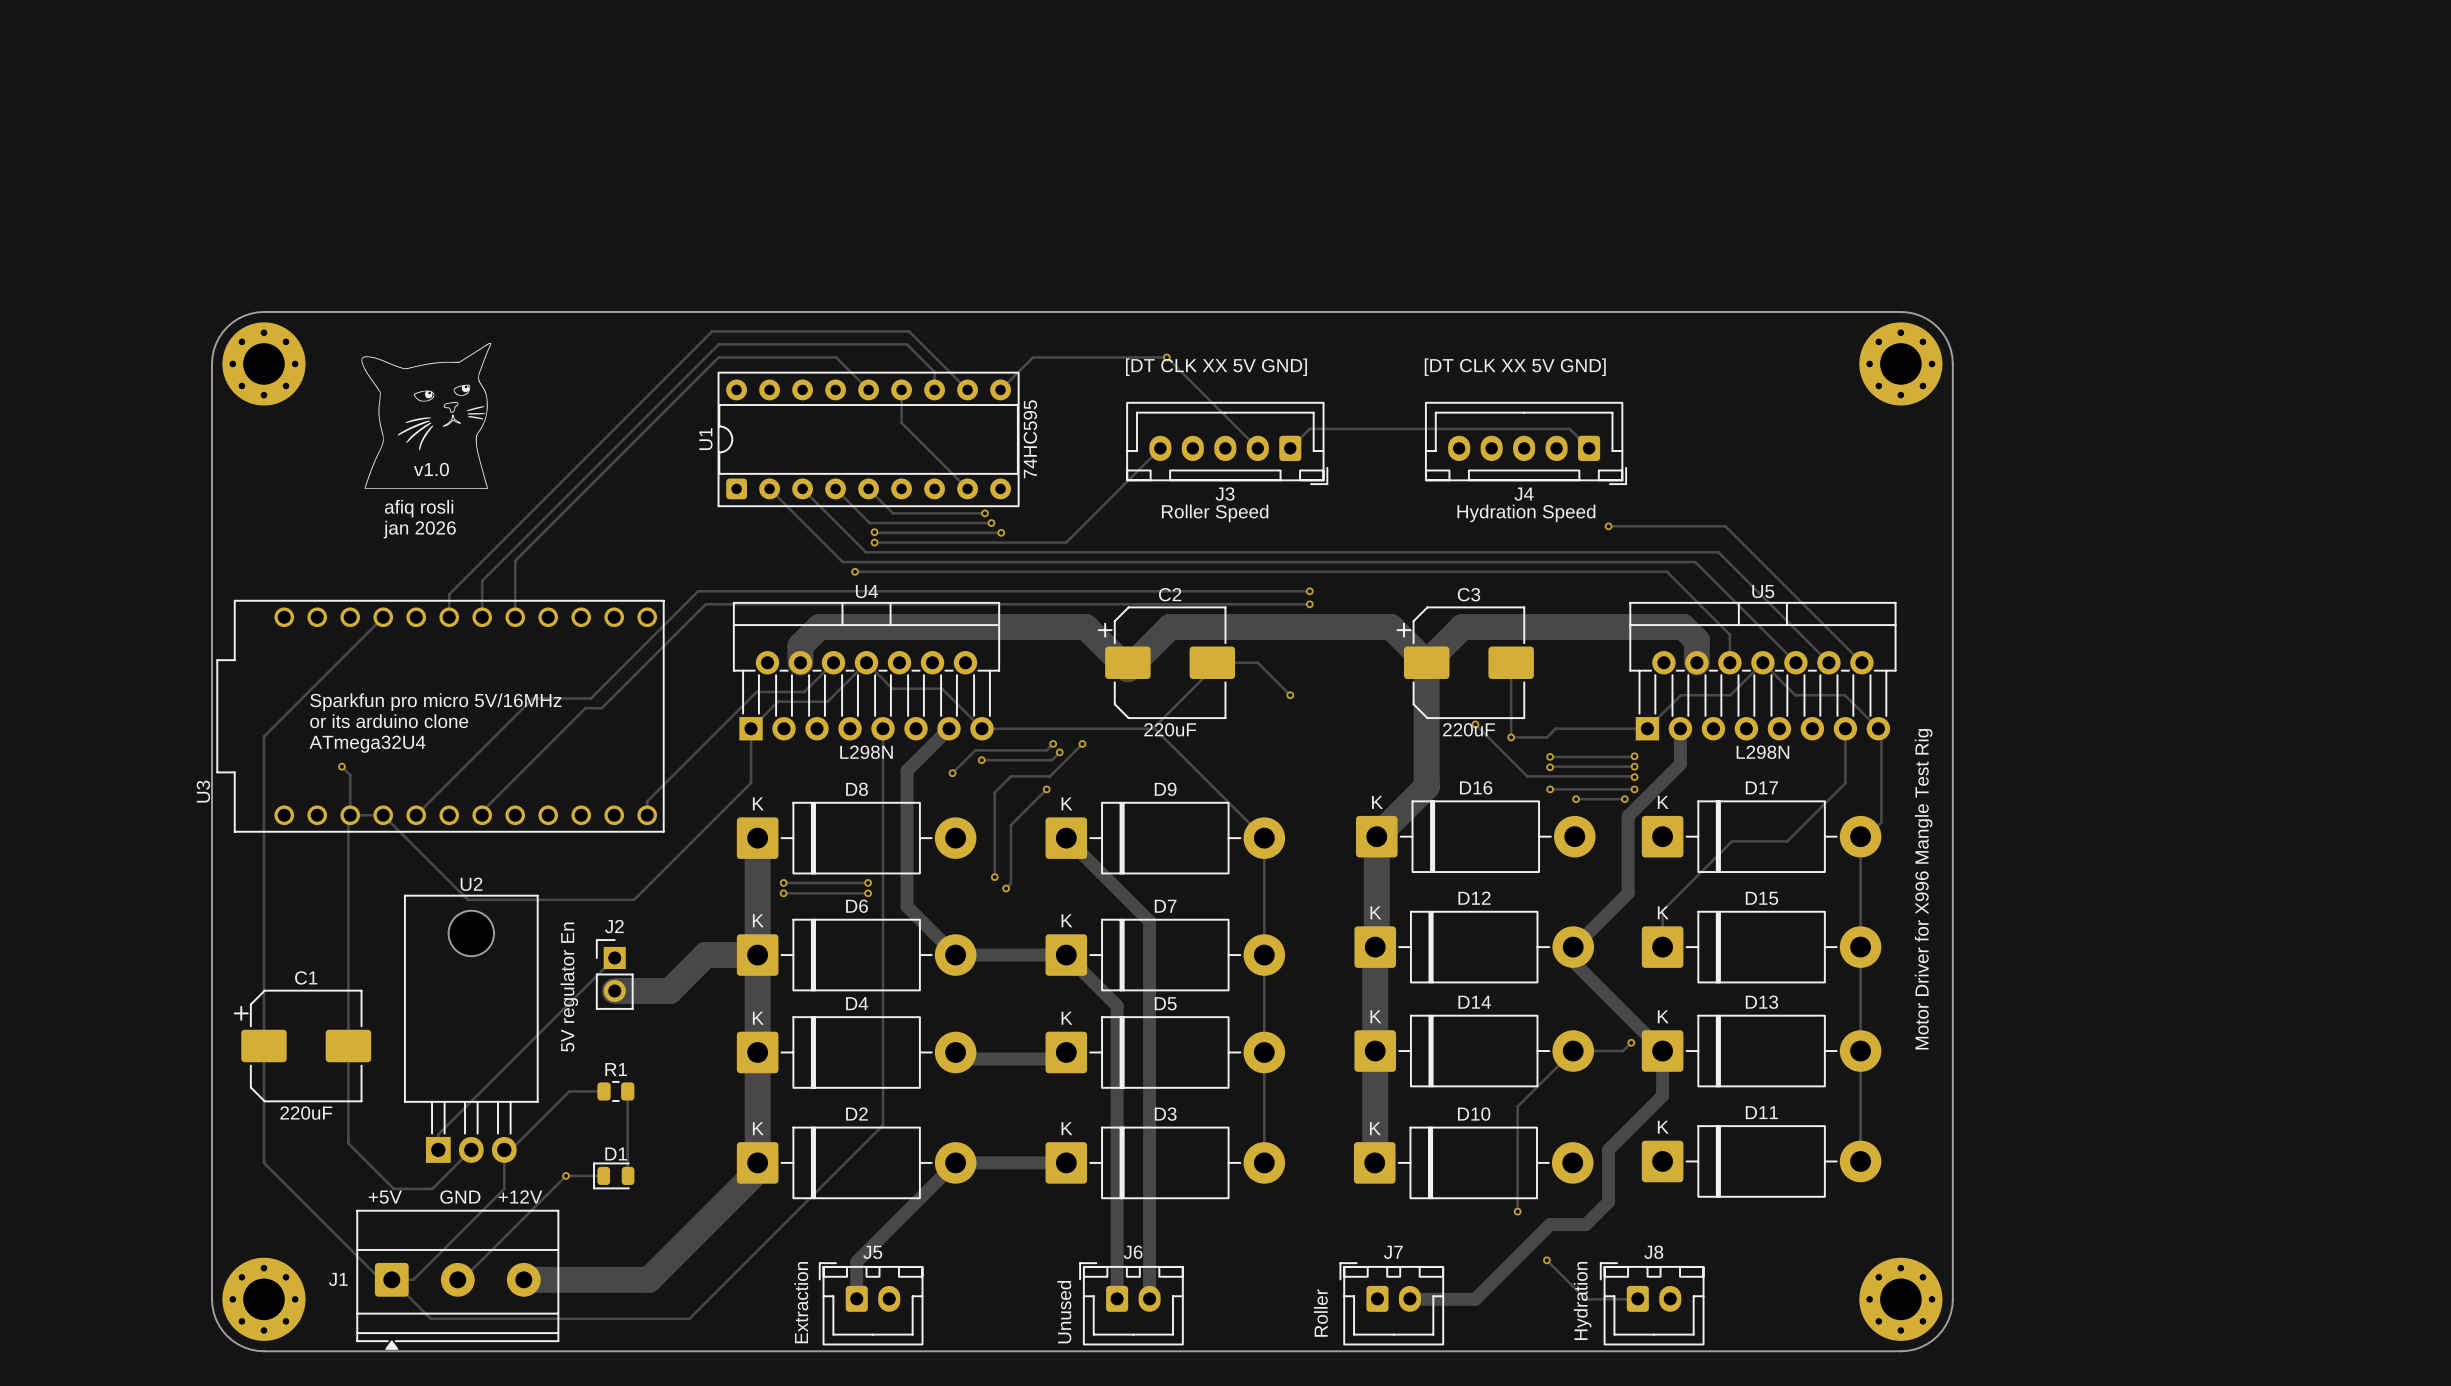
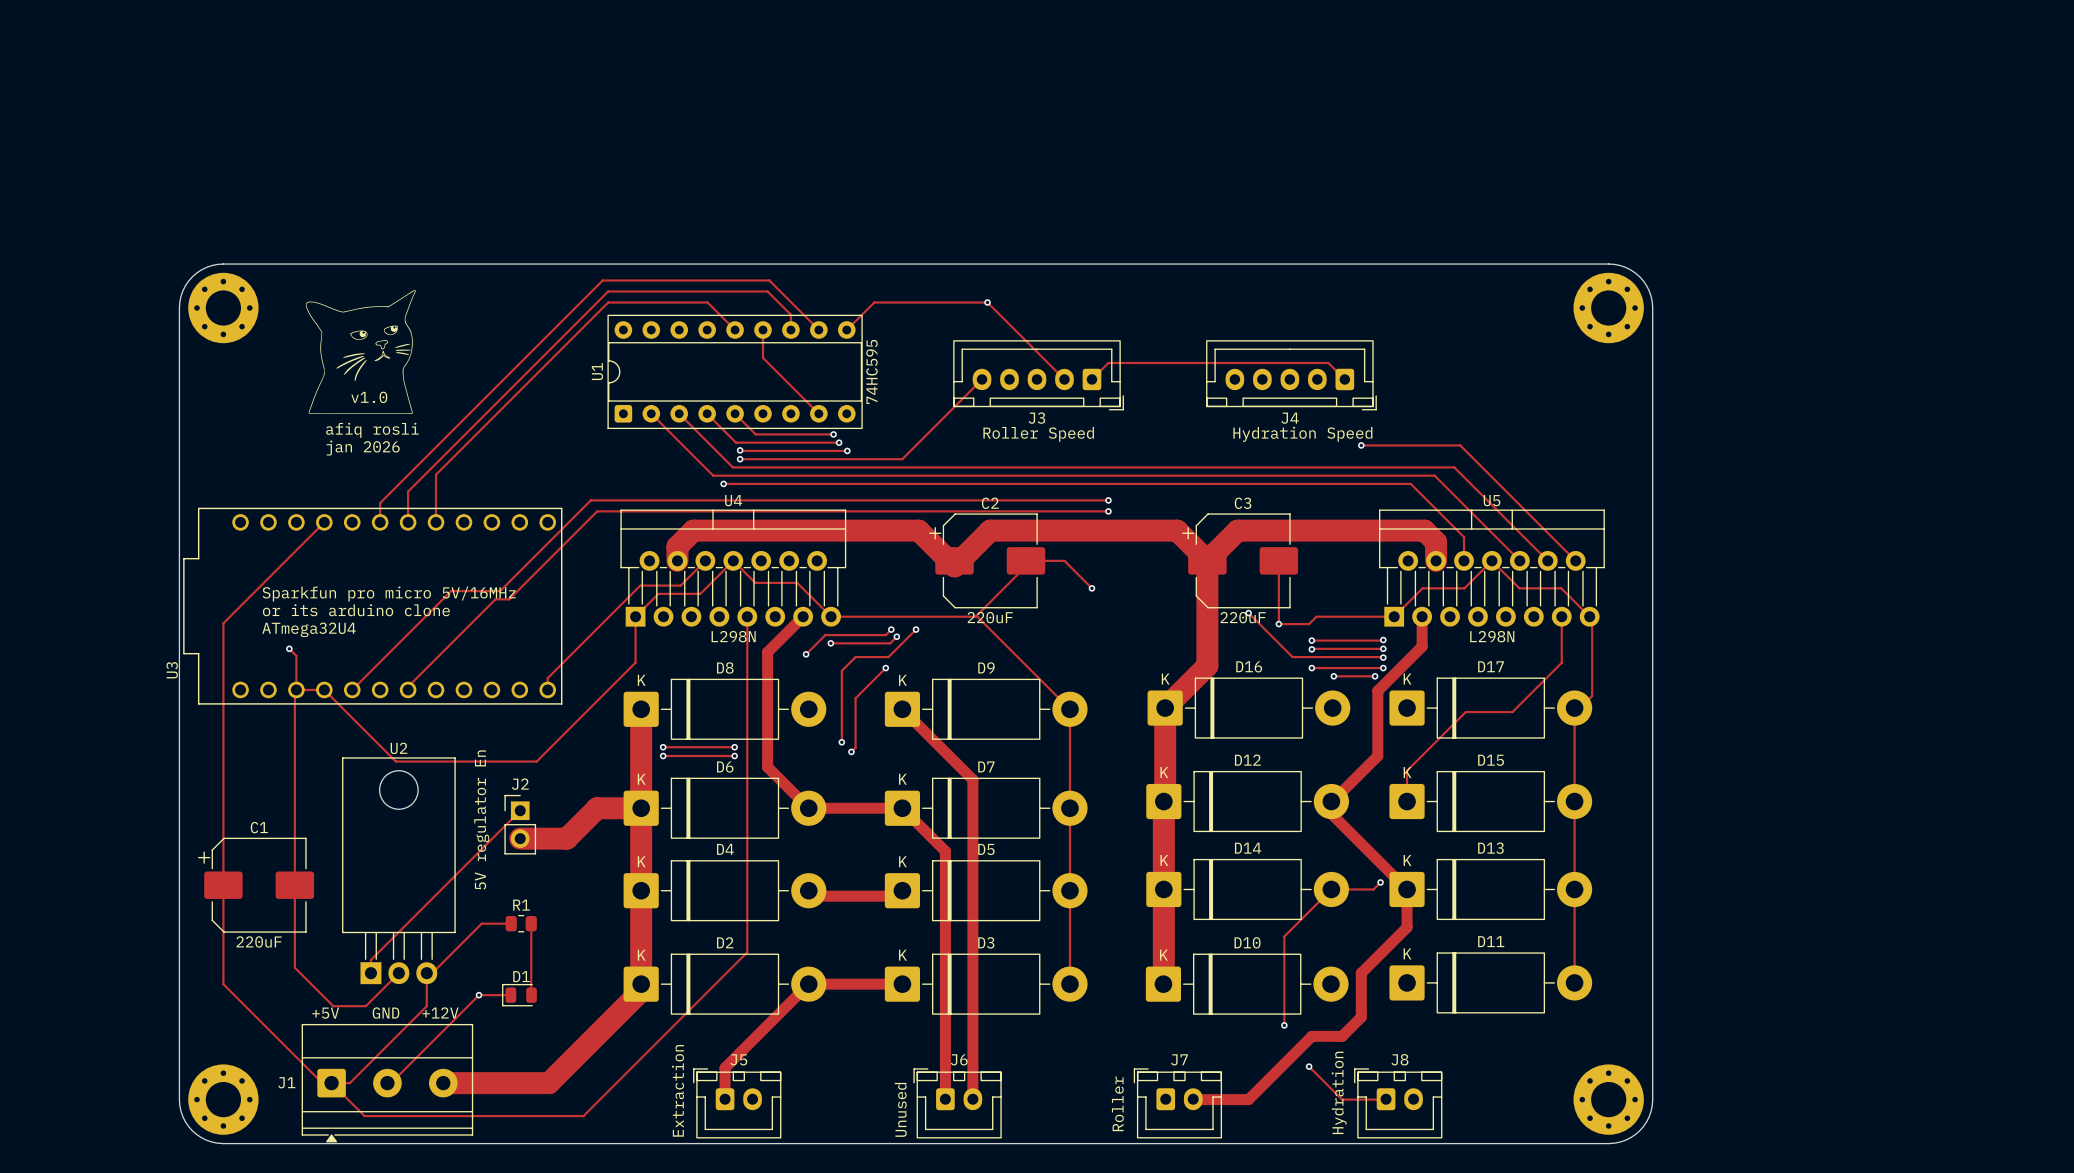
text: [DT CLK XX 5V GND] (1216, 367) -> none
text: [DT CLK XX 5V GND] (1515, 367) -> none
text: Motor Driver for X996 Mangle Test Rig (1923, 889) -> none

